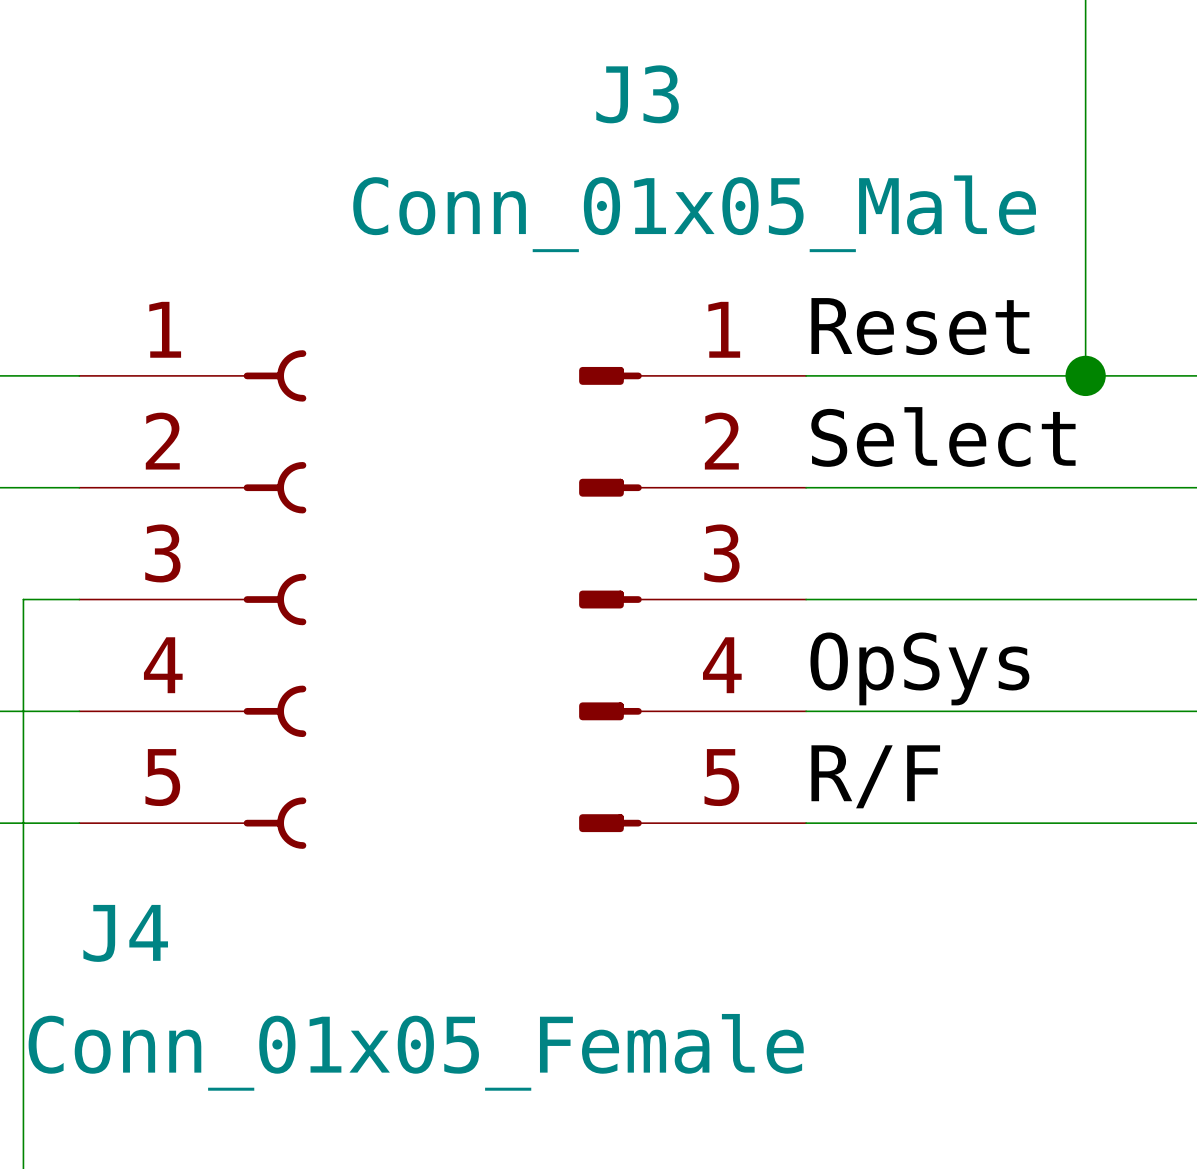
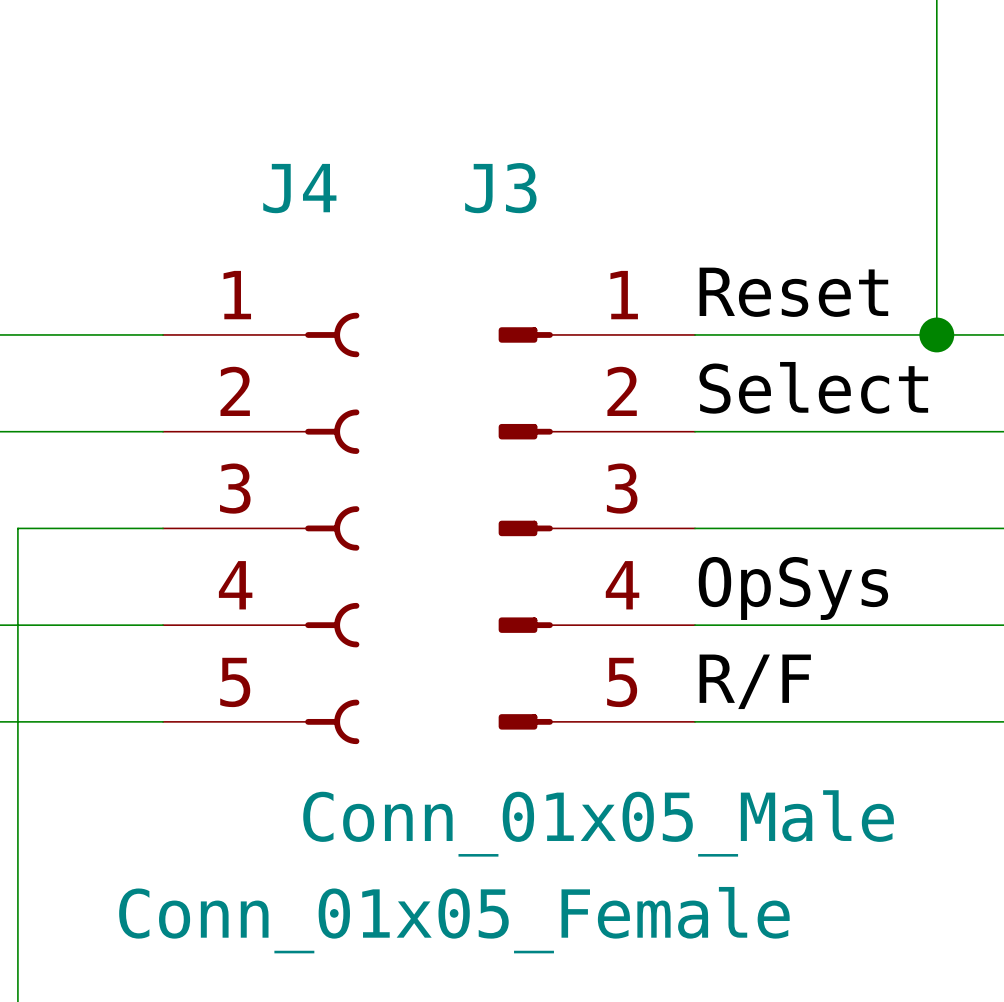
J3 name position: J3 (637, 94) -> J3 (500, 188)
J3 value position: Conn_01x05_Male (694, 213) -> Conn_01x05_Male (598, 823)
J4 position: (192, 599) -> (261, 528)
J4 name position: J4 (125, 933) -> J4 (299, 188)

